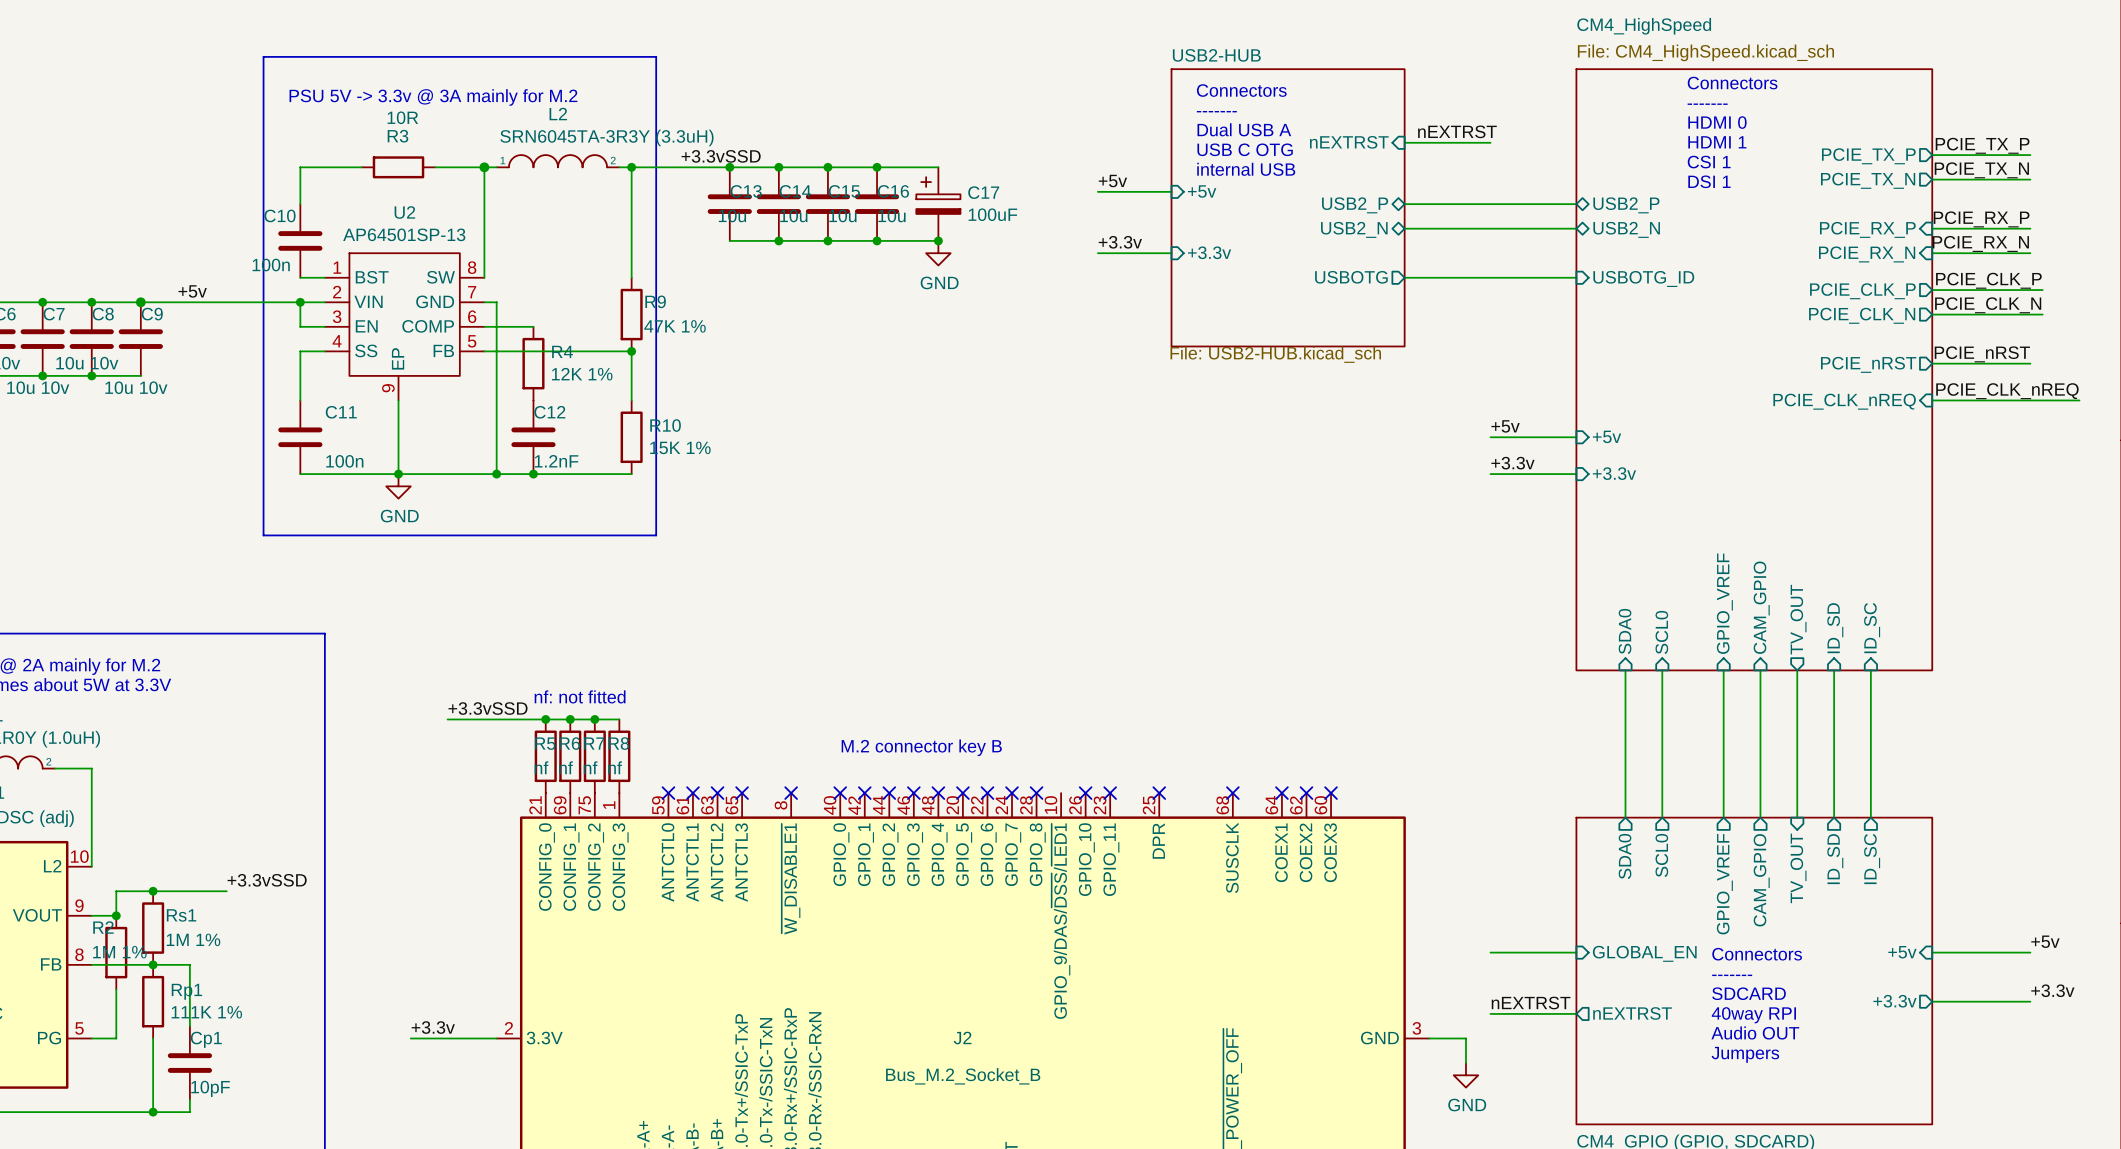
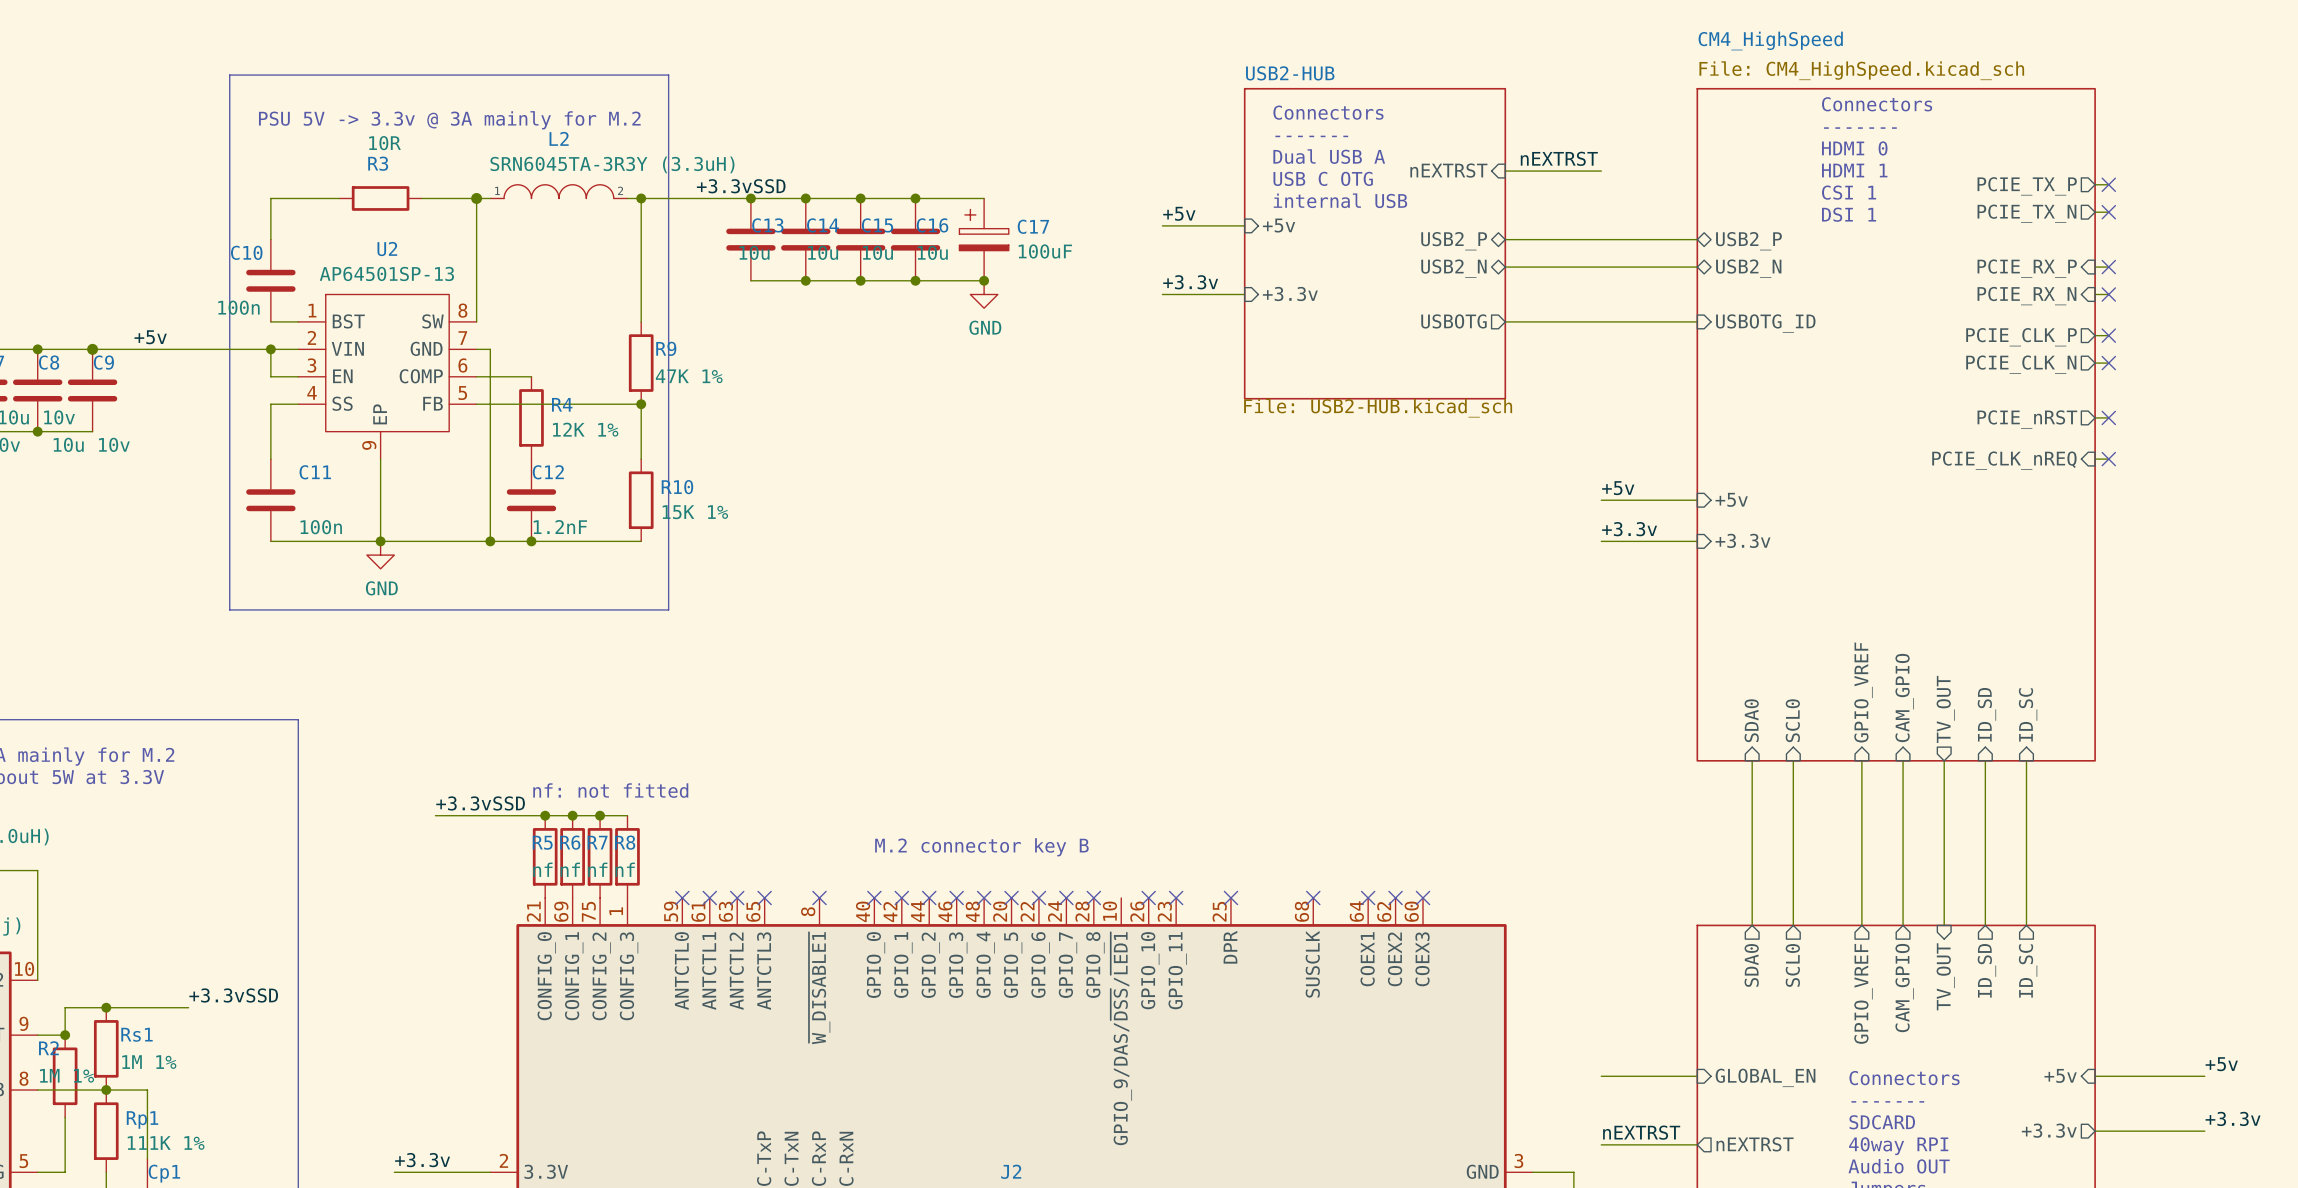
label: PCIE_TX_P (1982, 145) -> none
wire: (1944, 155) (2030, 155) -> none
no-connect mark: none -> (2108, 184)
label: PCIE_TX_N (1981, 170) -> none
wire: (1944, 179) (2030, 179) -> none
no-connect mark: none -> (2108, 212)
label: PCIE_RX_P (1981, 219) -> none
wire: (1944, 228) (2030, 228) -> none
no-connect mark: none -> (2108, 267)
label: PCIE_RX_N (1980, 243) -> none
wire: (1944, 253) (2030, 253) -> none
no-connect mark: none -> (2108, 294)
label: PCIE_CLK_P (1988, 280) -> none
wire: (1944, 290) (2042, 290) -> none
no-connect mark: none -> (2108, 335)
label: PCIE_CLK_N (1988, 305) -> none
wire: (1944, 314) (2042, 314) -> none
no-connect mark: none -> (2108, 363)
label: PCIE_nRST (1982, 354) -> none
wire: (1944, 363) (2030, 363) -> none
no-connect mark: none -> (2108, 417)
label: PCIE_CLK_nREQ (2007, 391) -> none
wire: (1944, 400) (2079, 400) -> none
no-connect mark: none -> (2108, 459)

